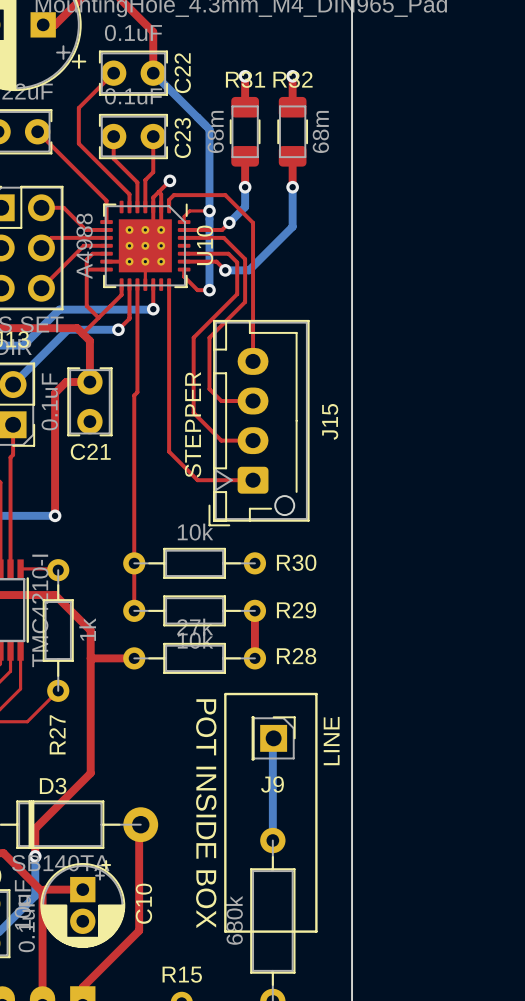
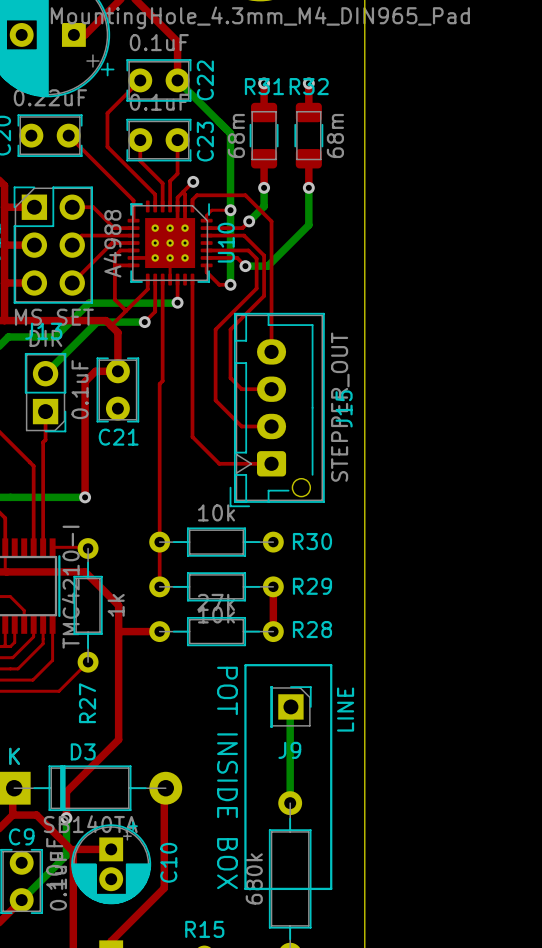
J15 value: STEPPER (193, 424) -> STEPPER_OUT (340, 407)

